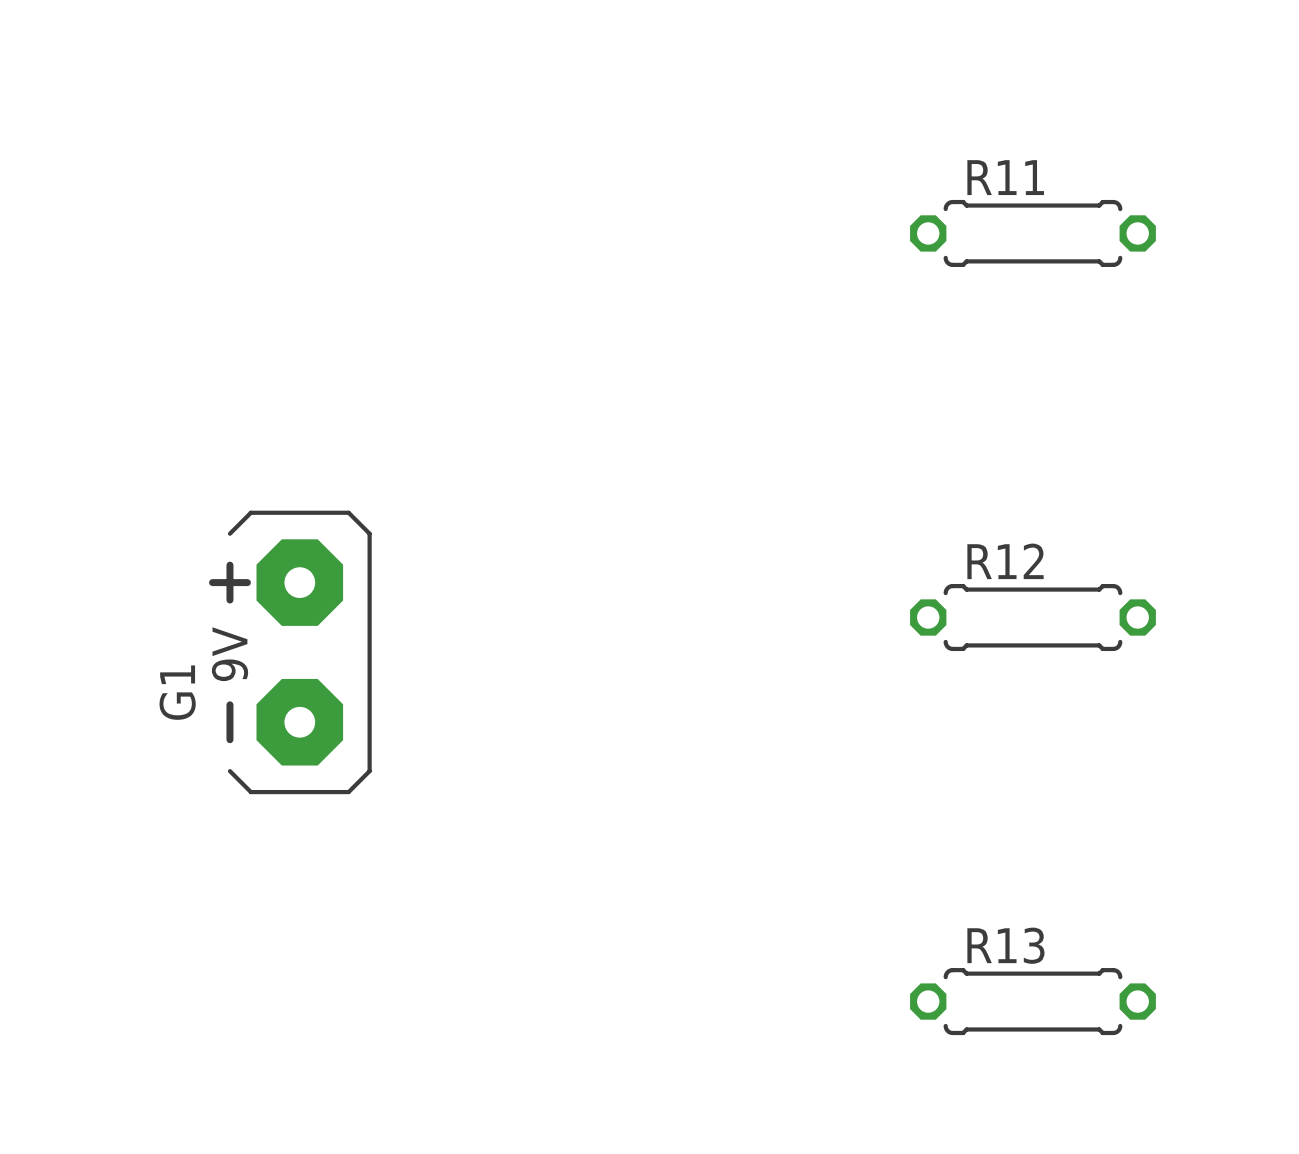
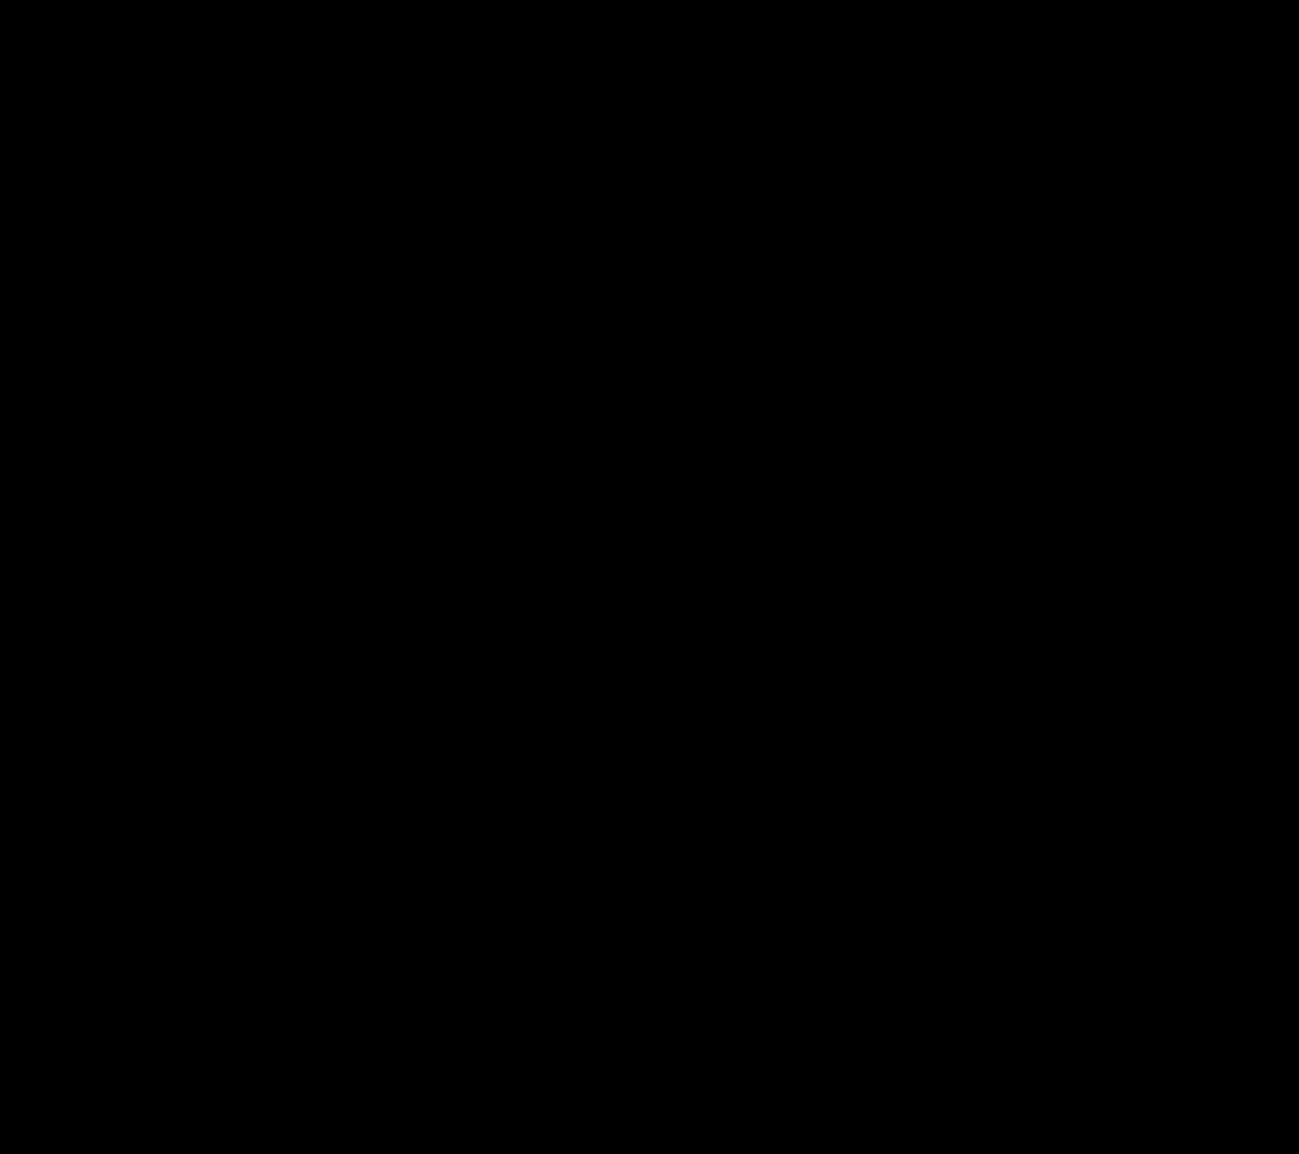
R11: (1032, 233) -> none
R12: (1032, 617) -> none
G1: (290, 652) -> none
R13: (1032, 1001) -> none

